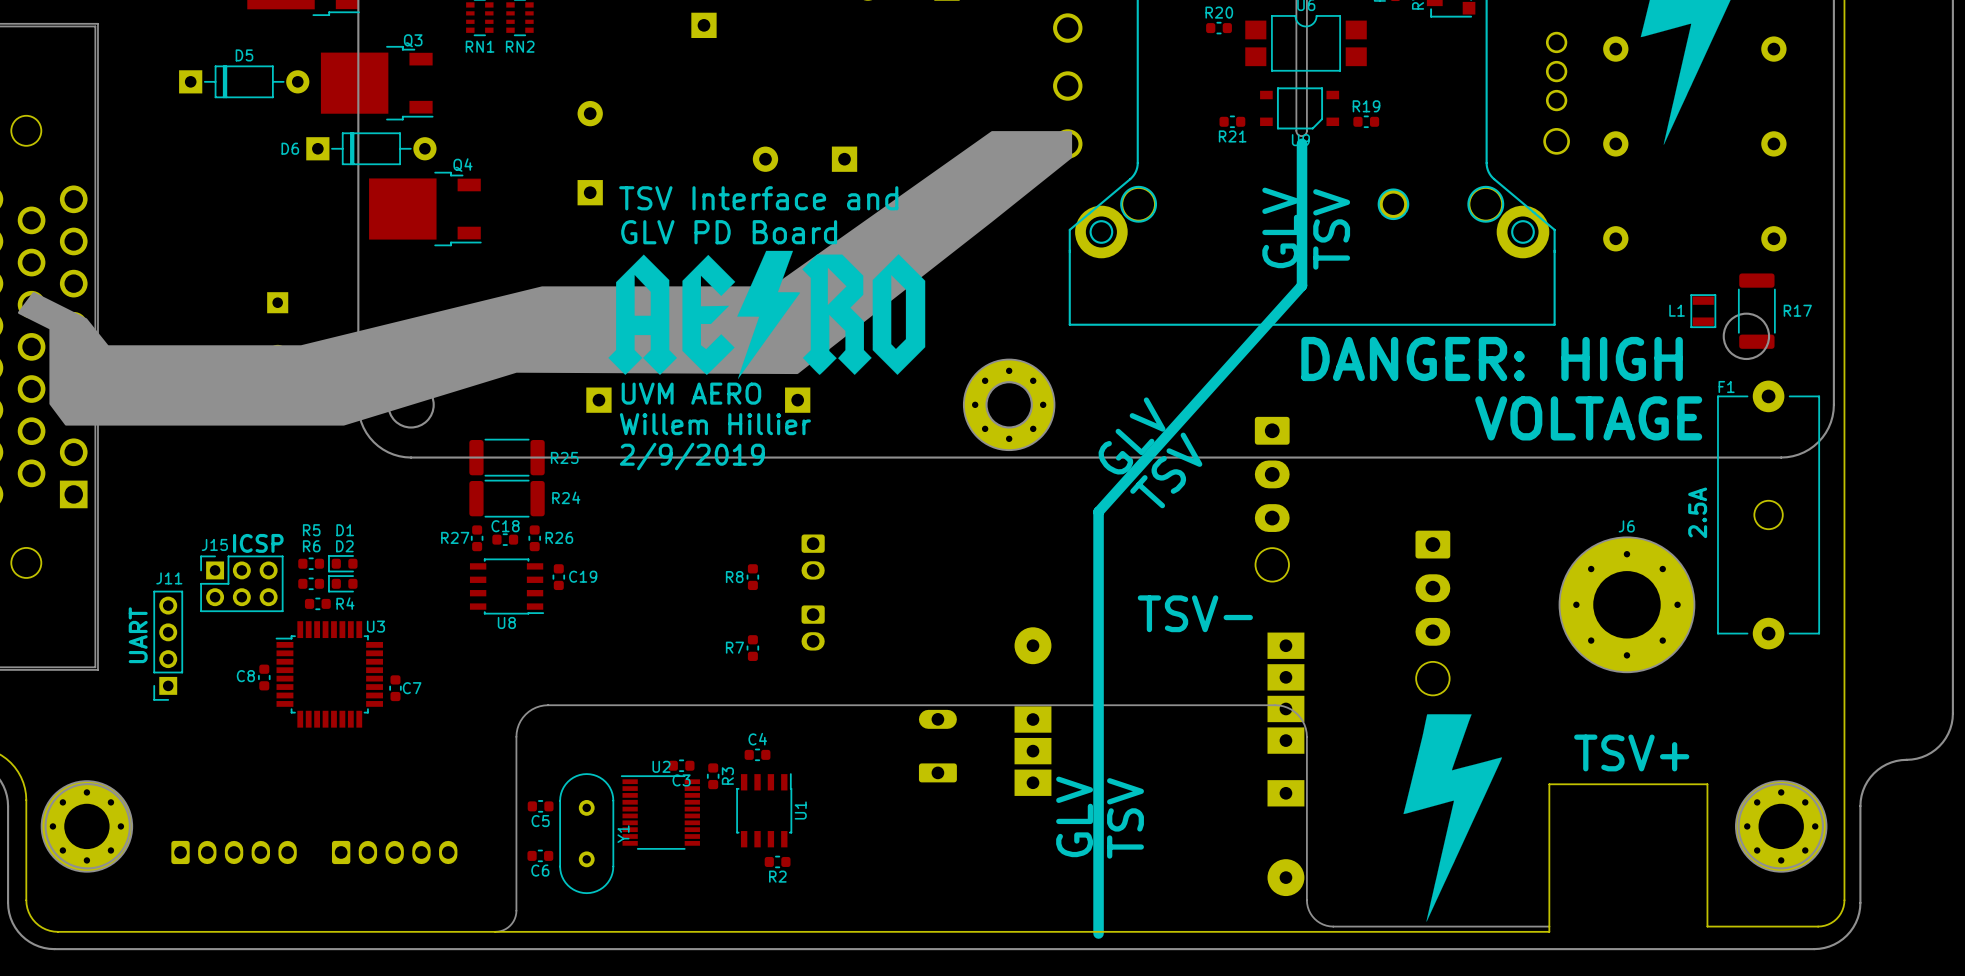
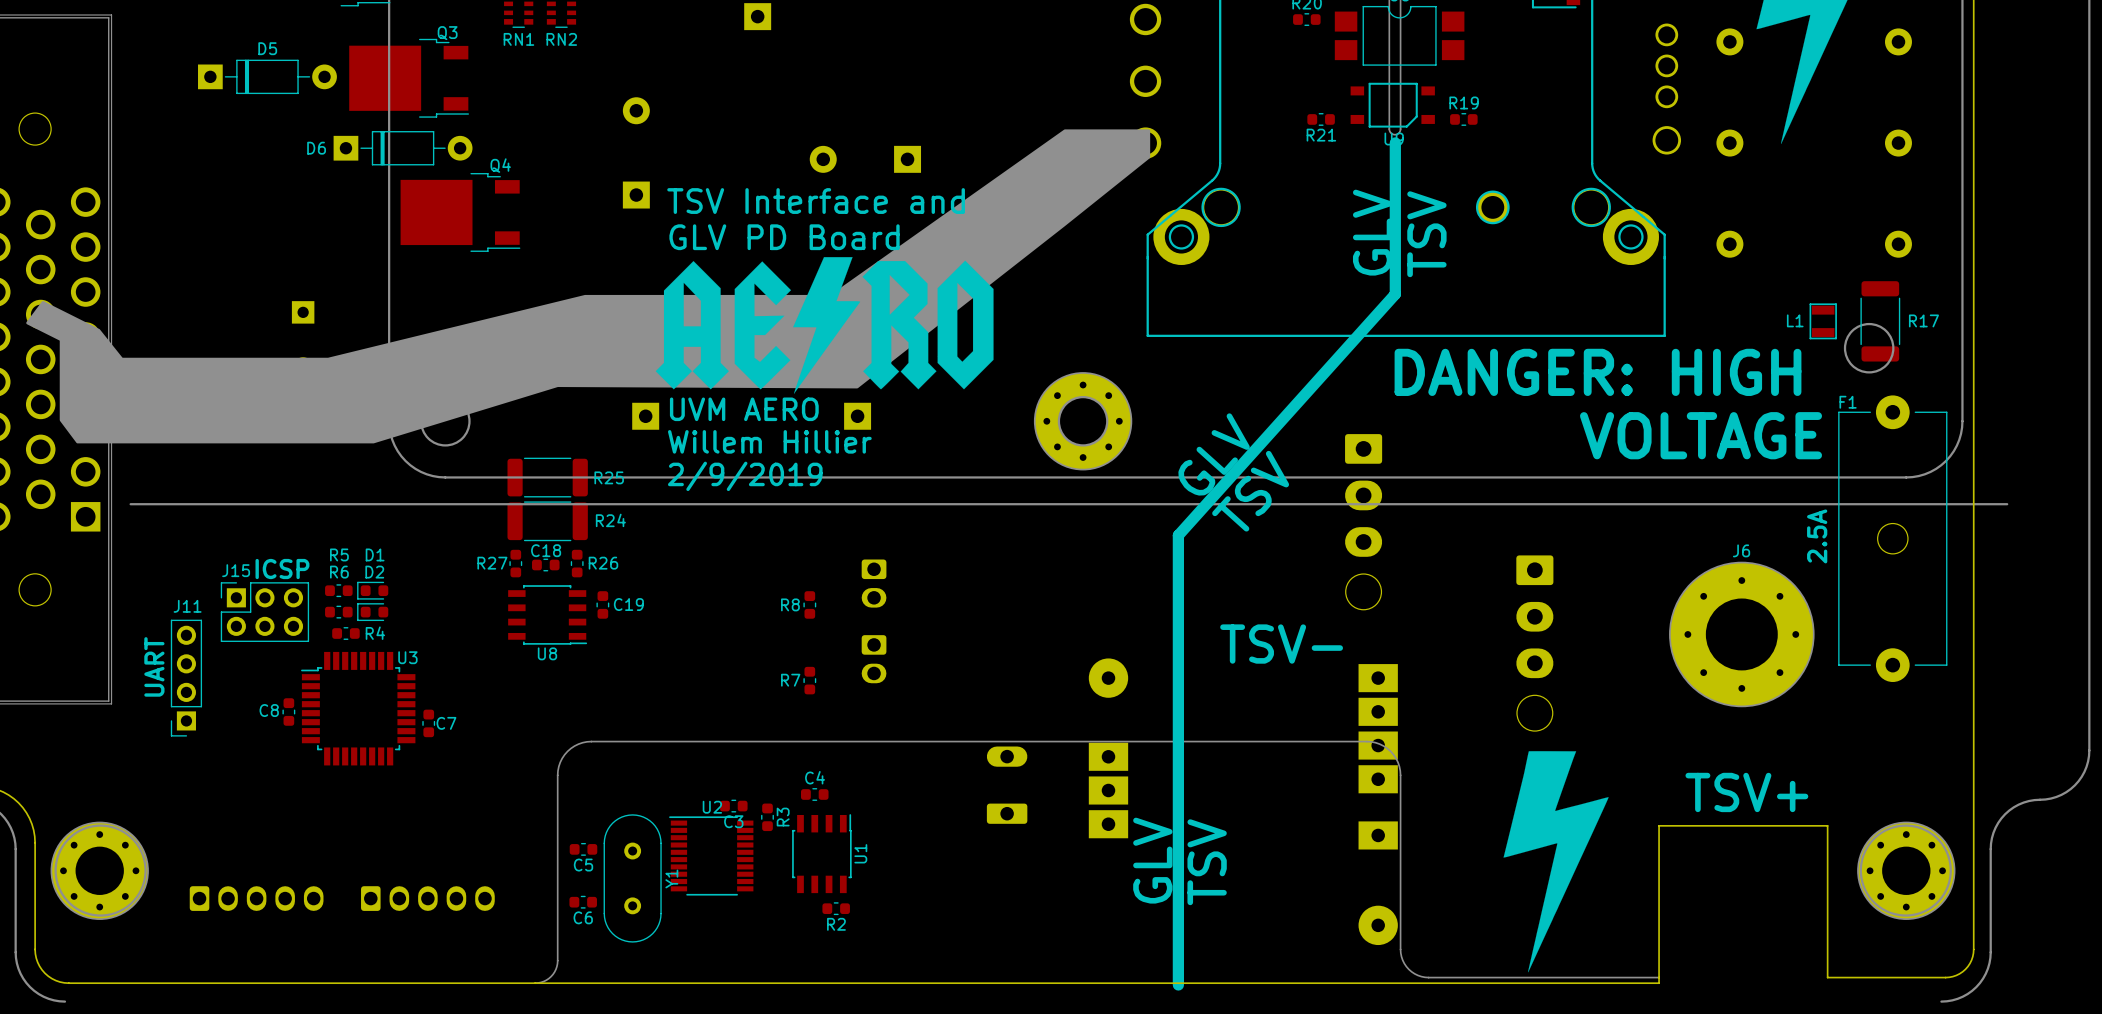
line: none -> (130, 504) (2007, 504)
line: (54, 949) (1814, 949) -> none

